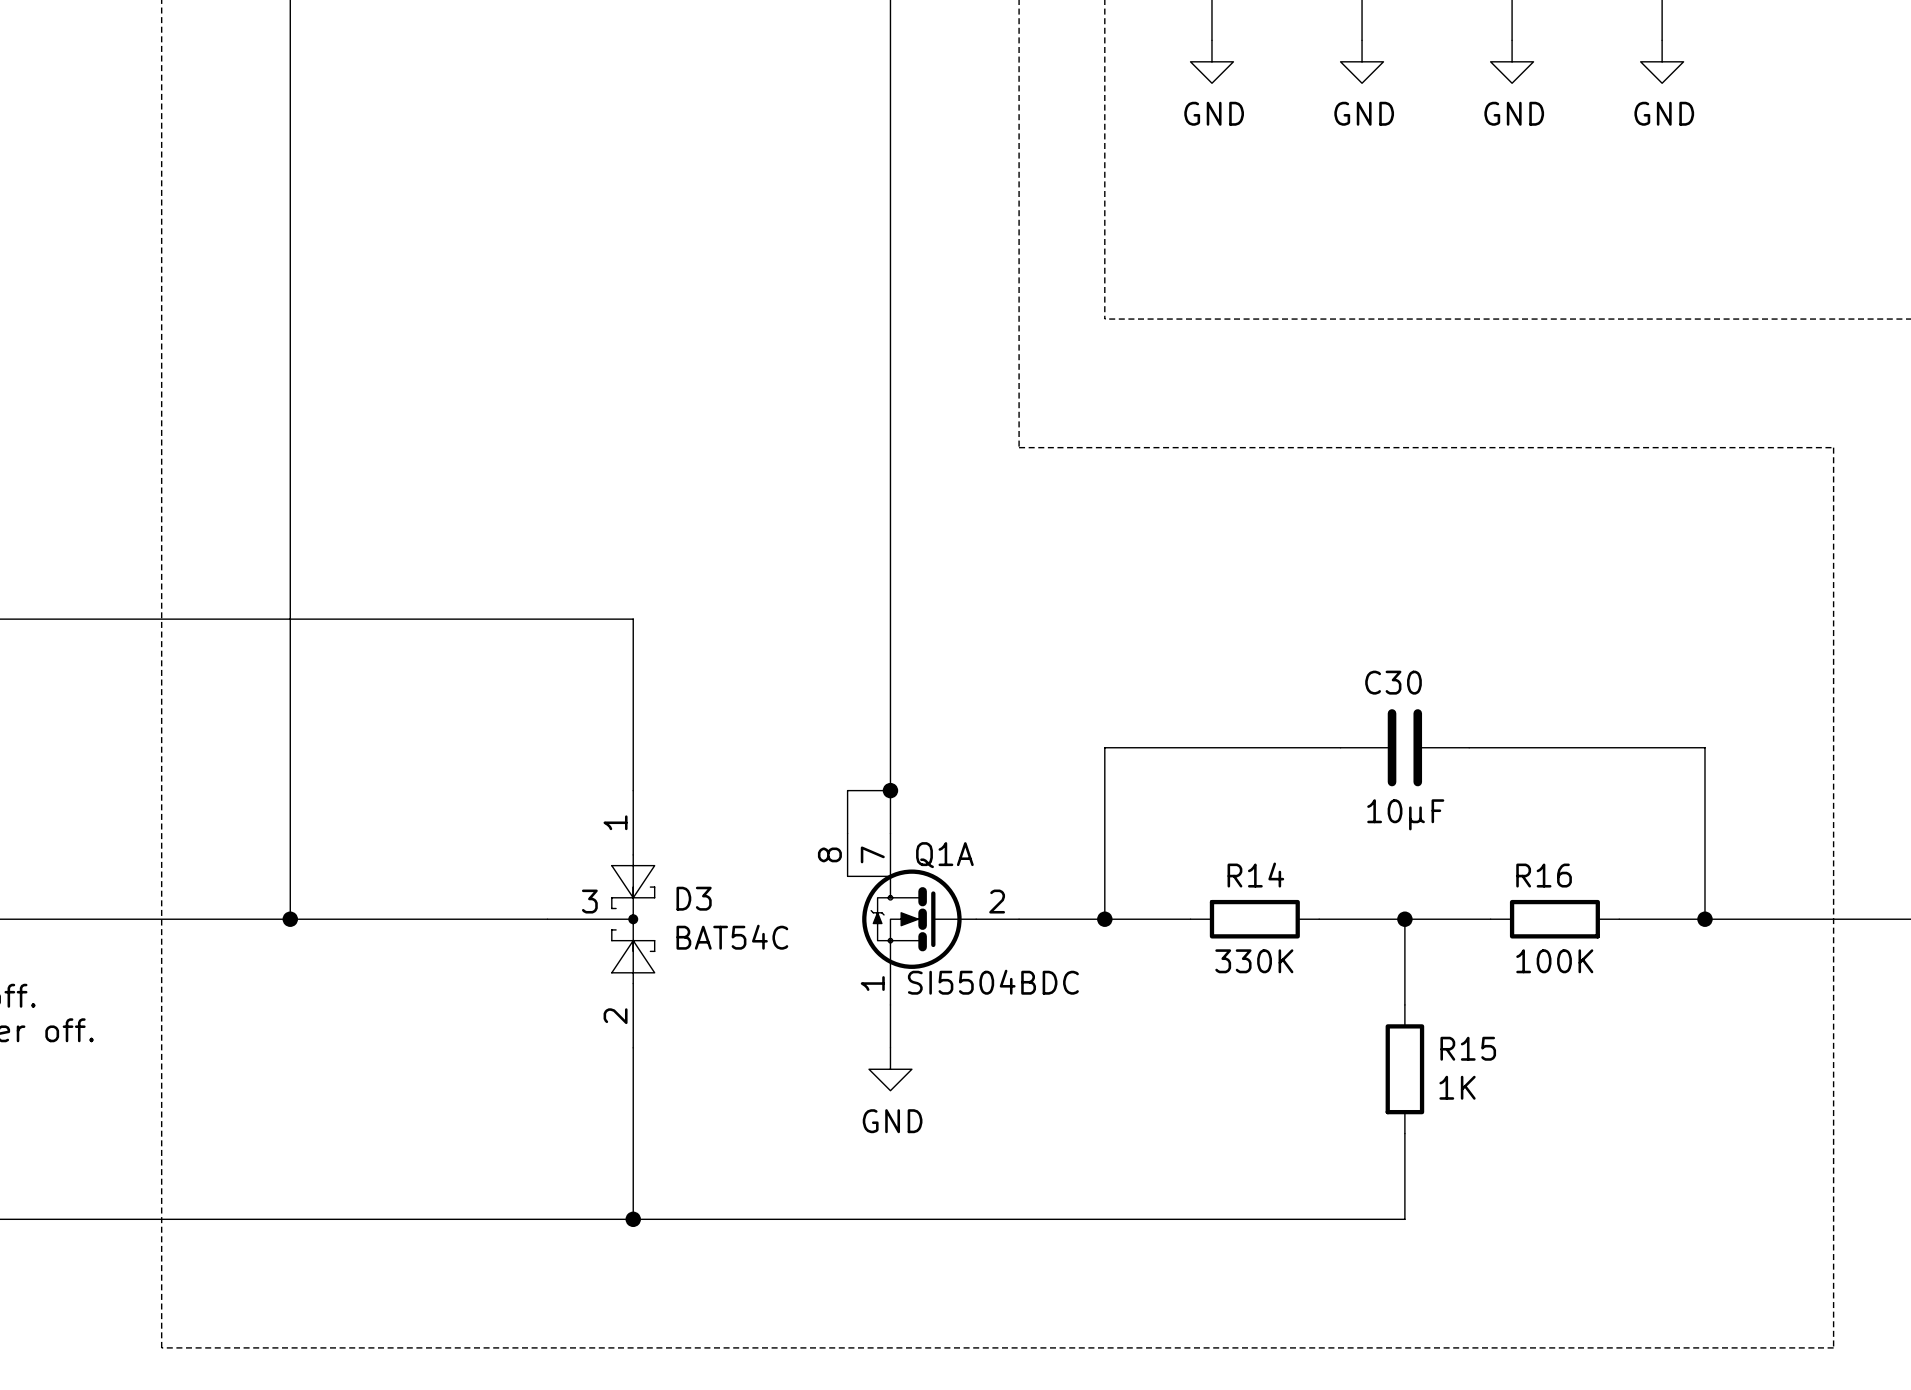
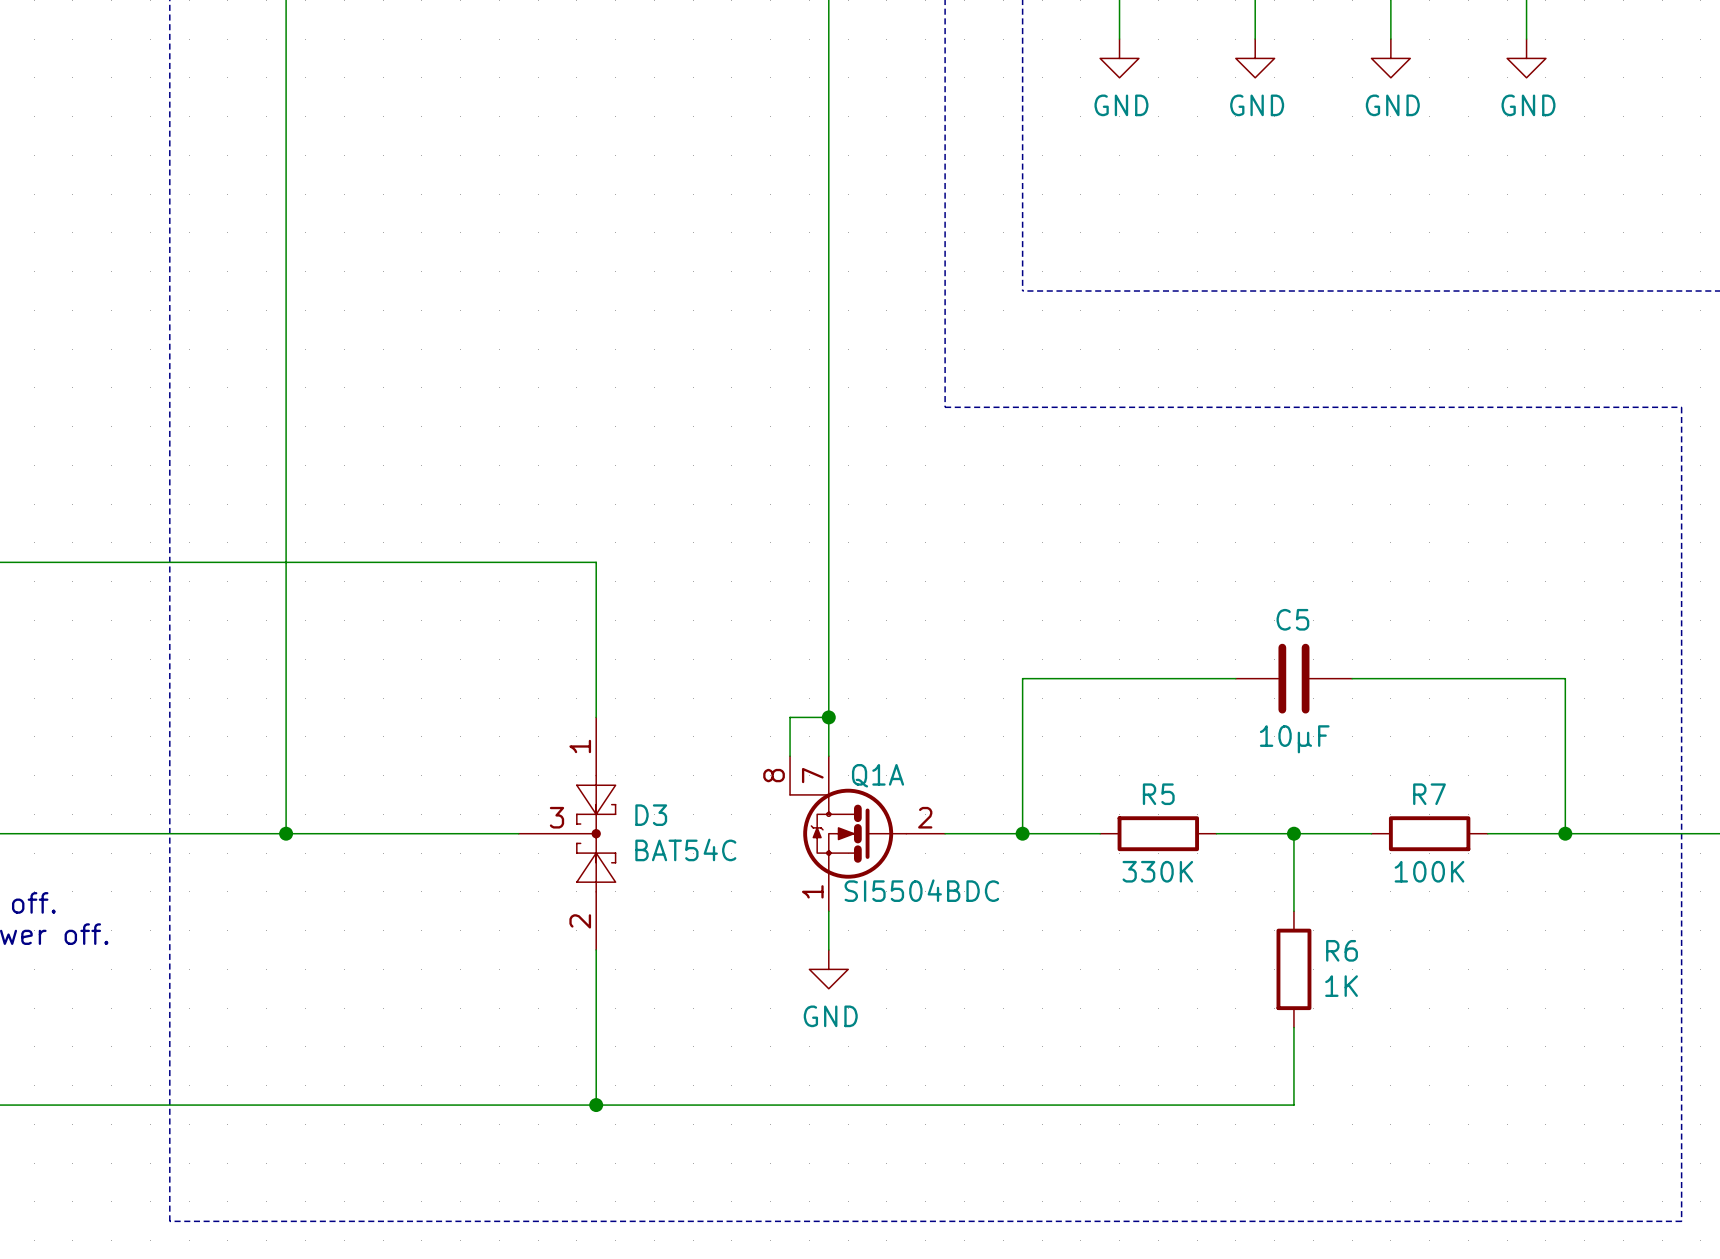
C30 name: C30 (1393, 682) -> C5 (1292, 619)
R14 name: R14 (1255, 875) -> R5 (1158, 794)
R16 name: R16 (1544, 875) -> R7 (1429, 794)
R15 name: R15 (1468, 1048) -> R6 (1342, 950)

